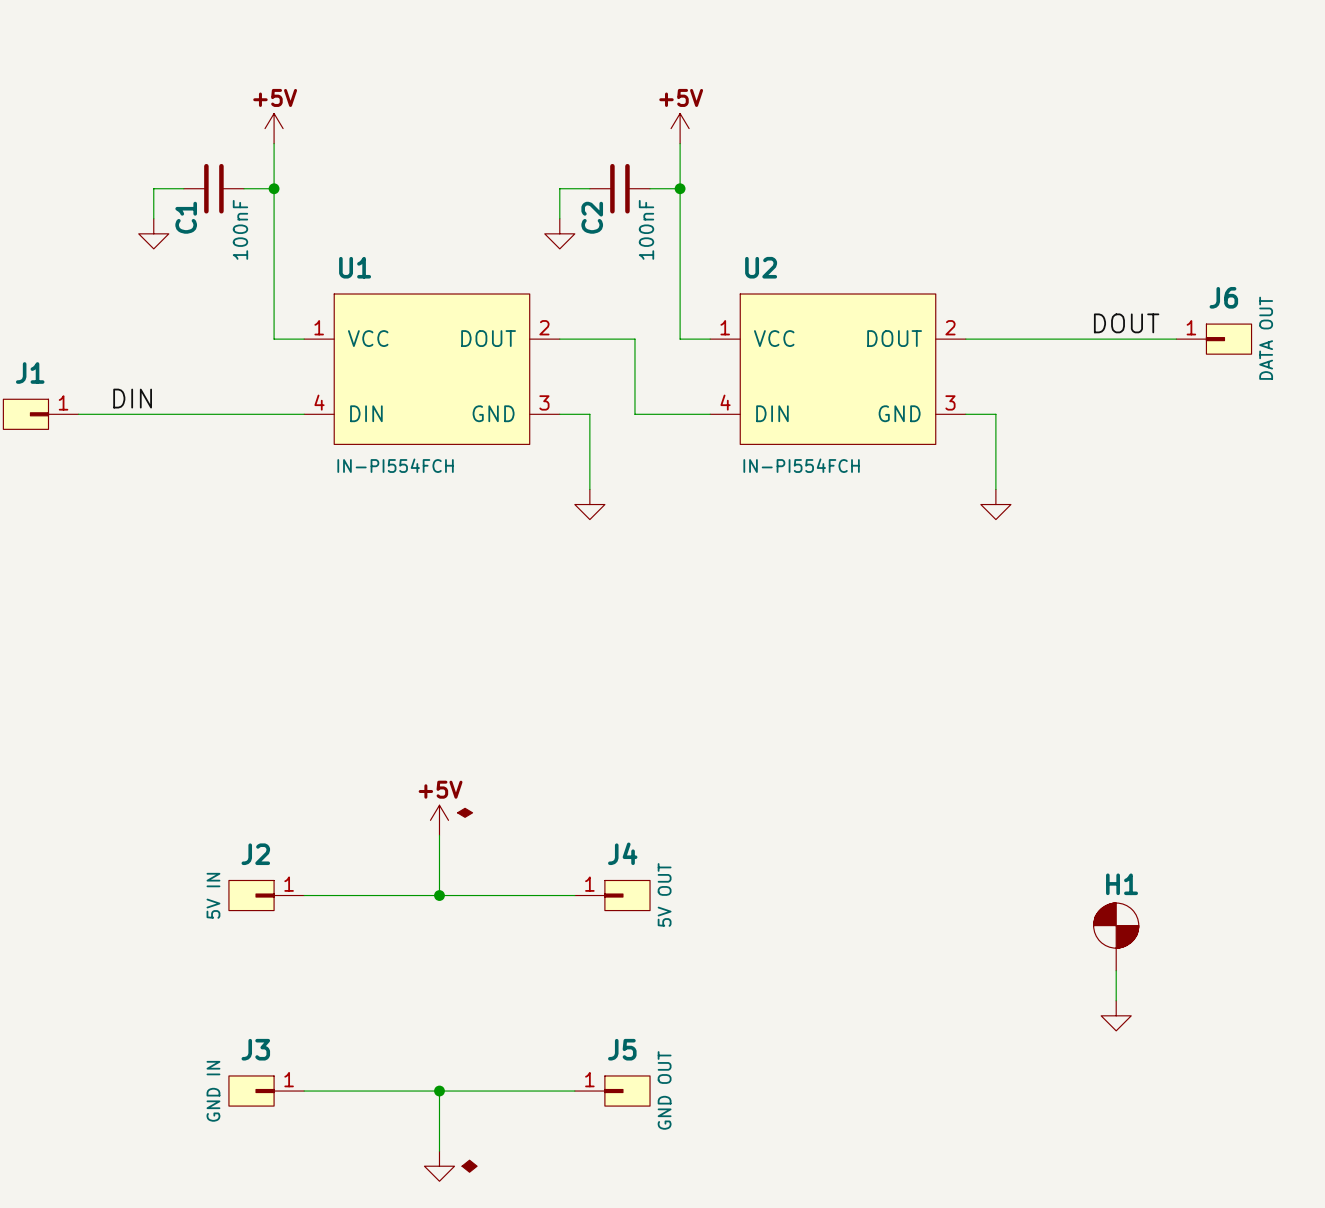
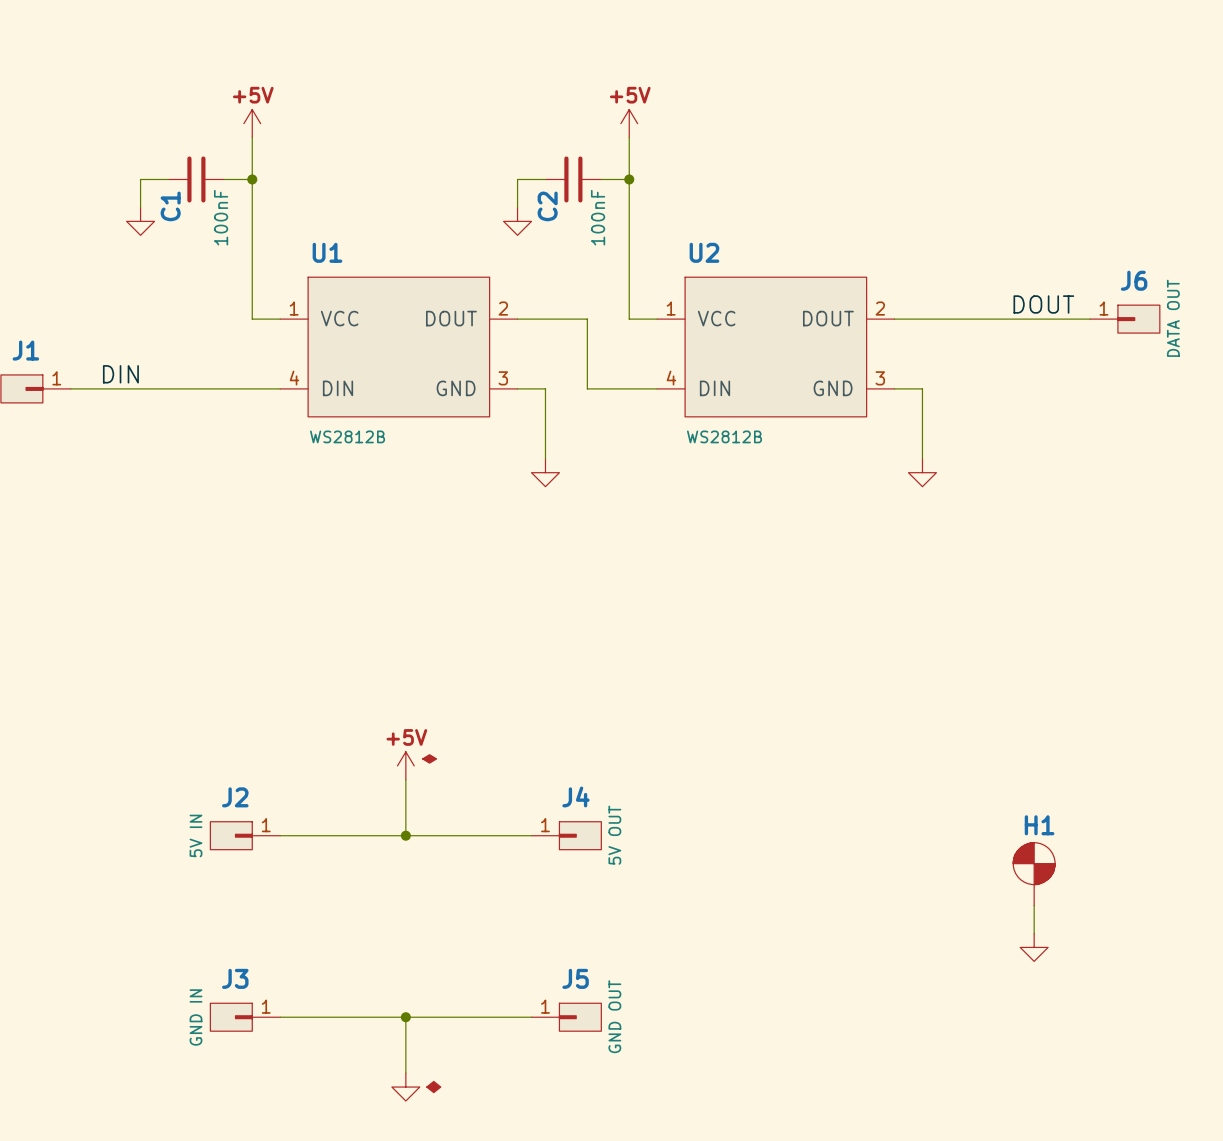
U1 value: IN-PI554FCH (395, 465) -> WS2812B (347, 436)
U2 value: IN-PI554FCH (801, 465) -> WS2812B (724, 436)

